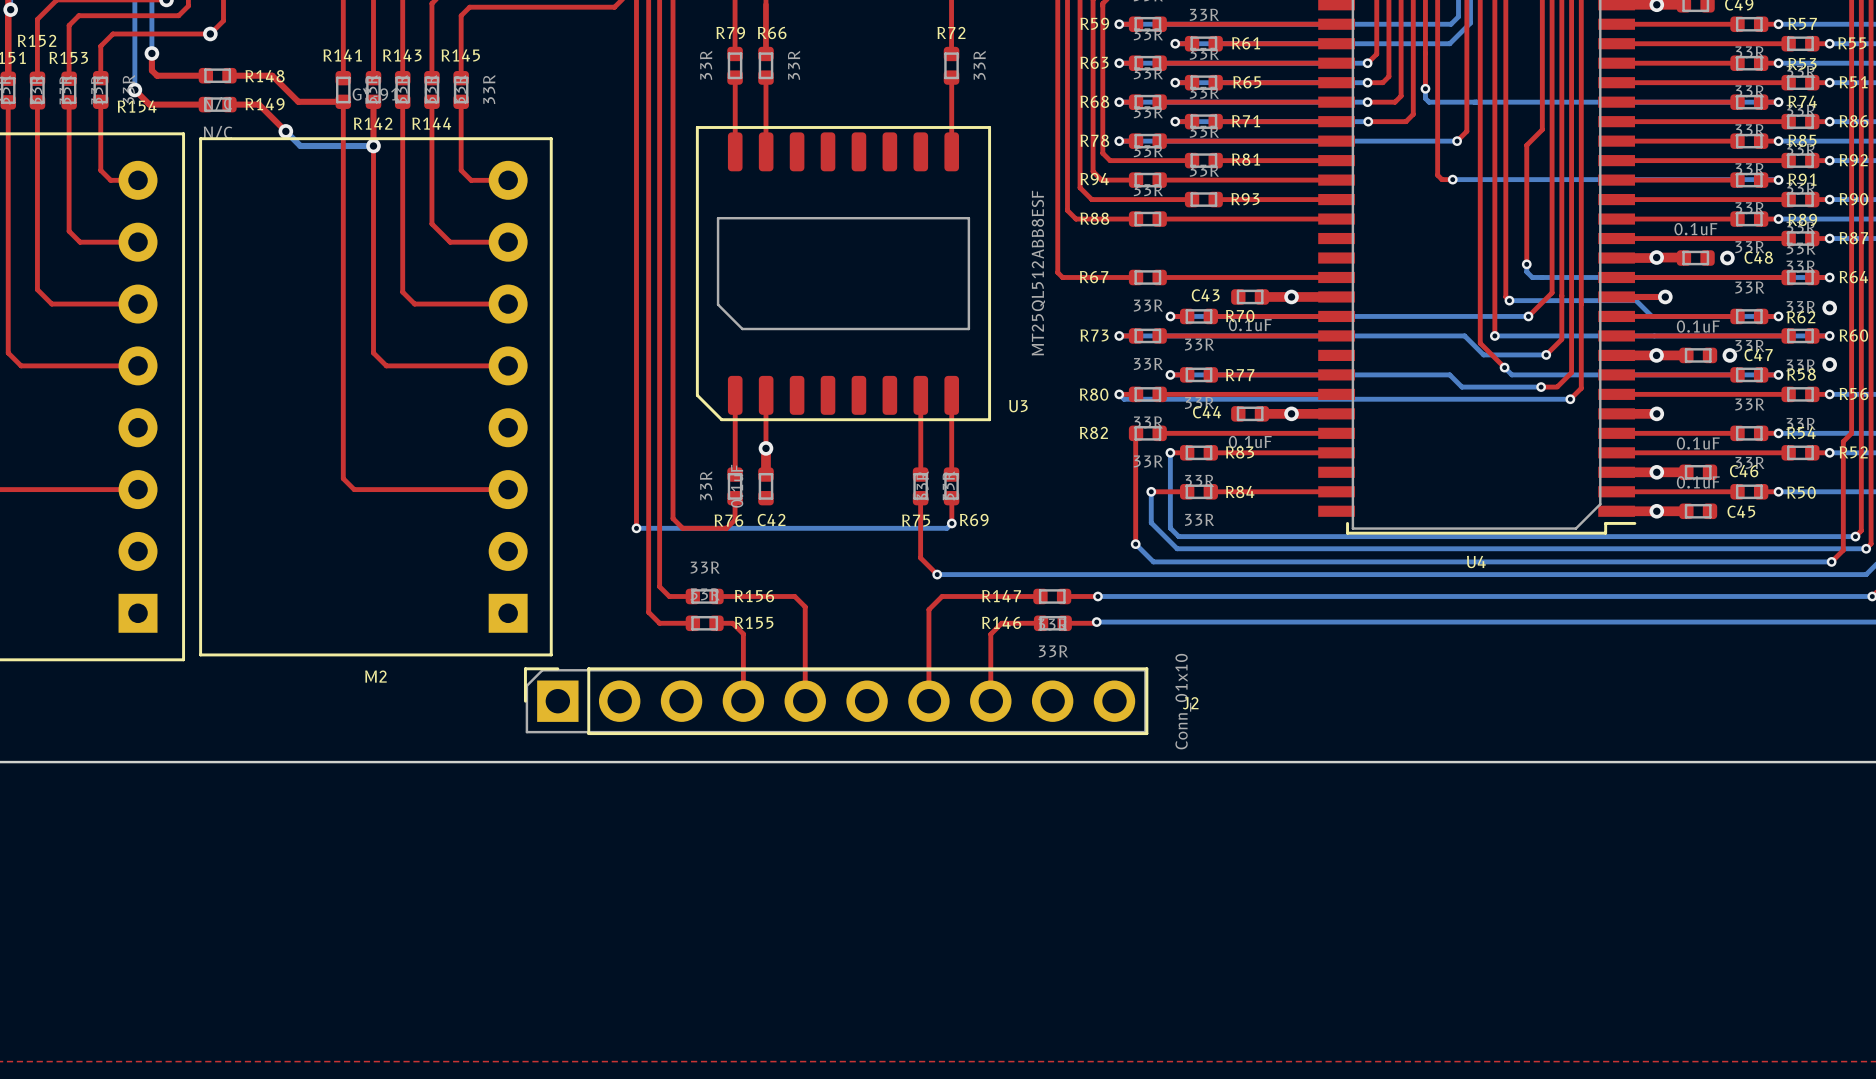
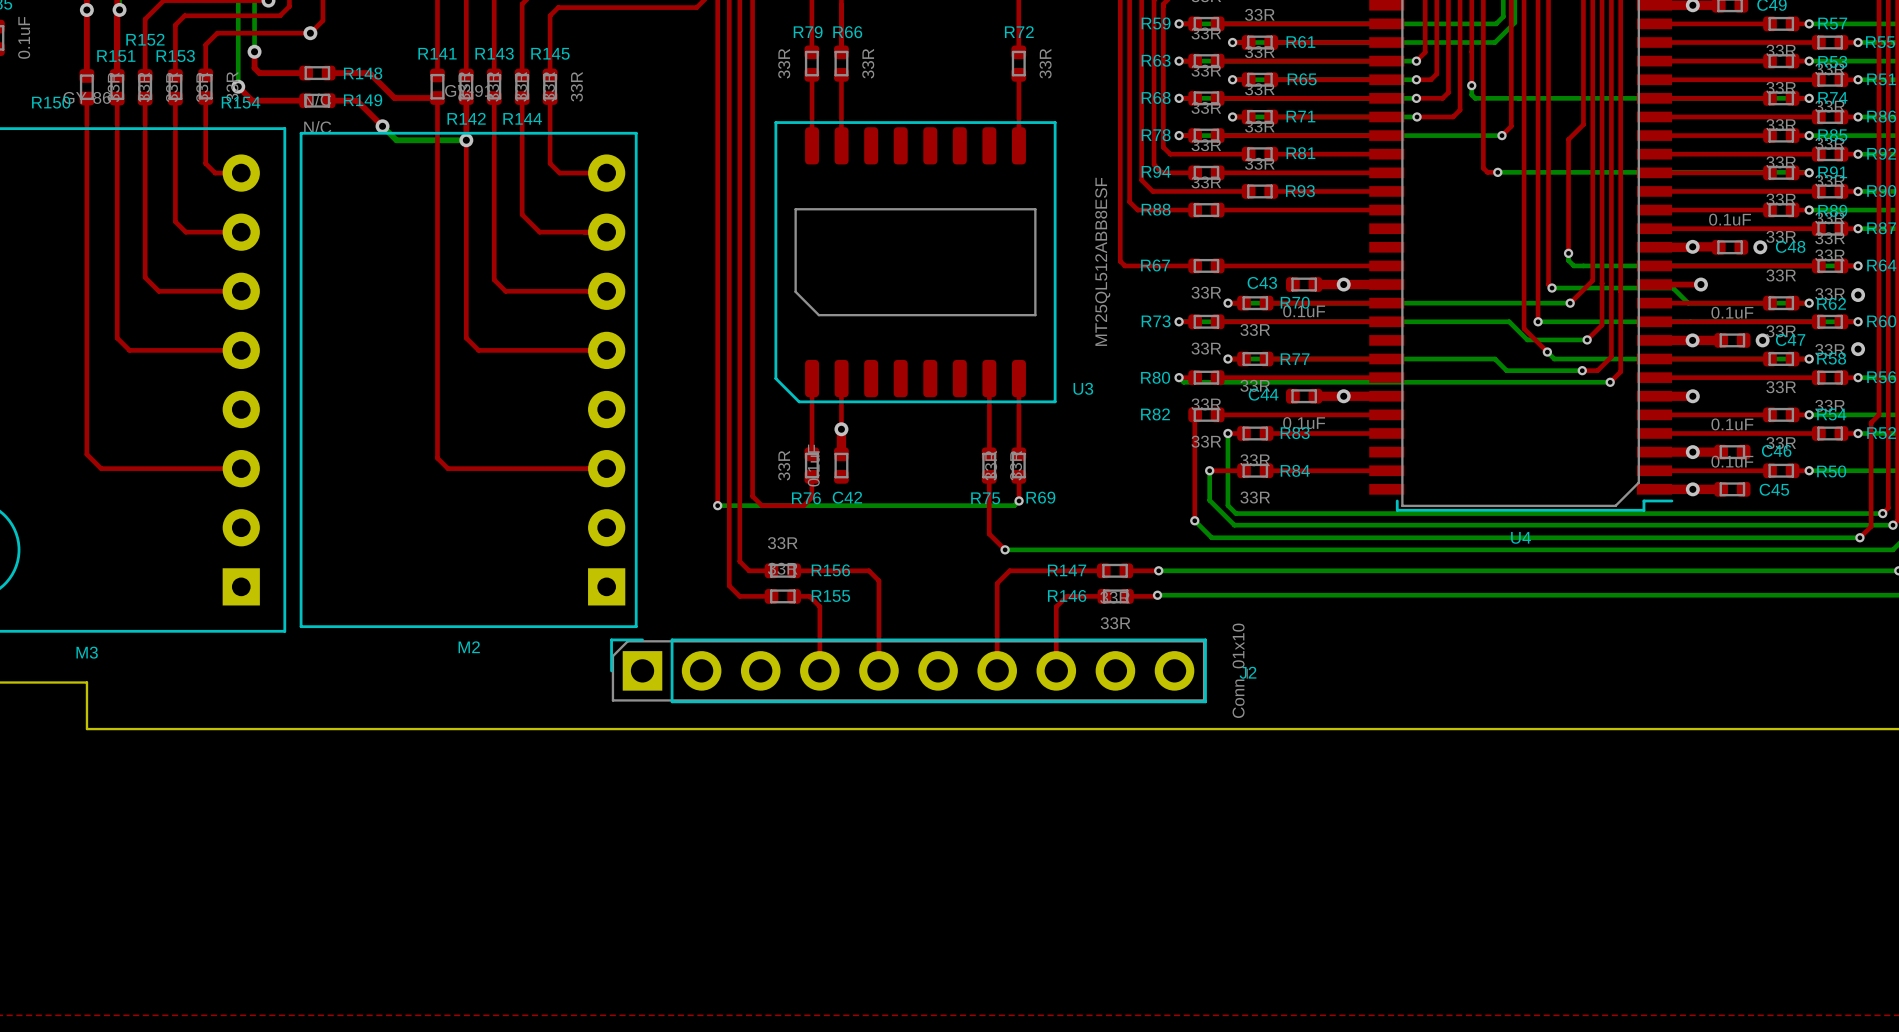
M2 footprint: [199, 137, 553, 657] -> [299, 131, 638, 629]

